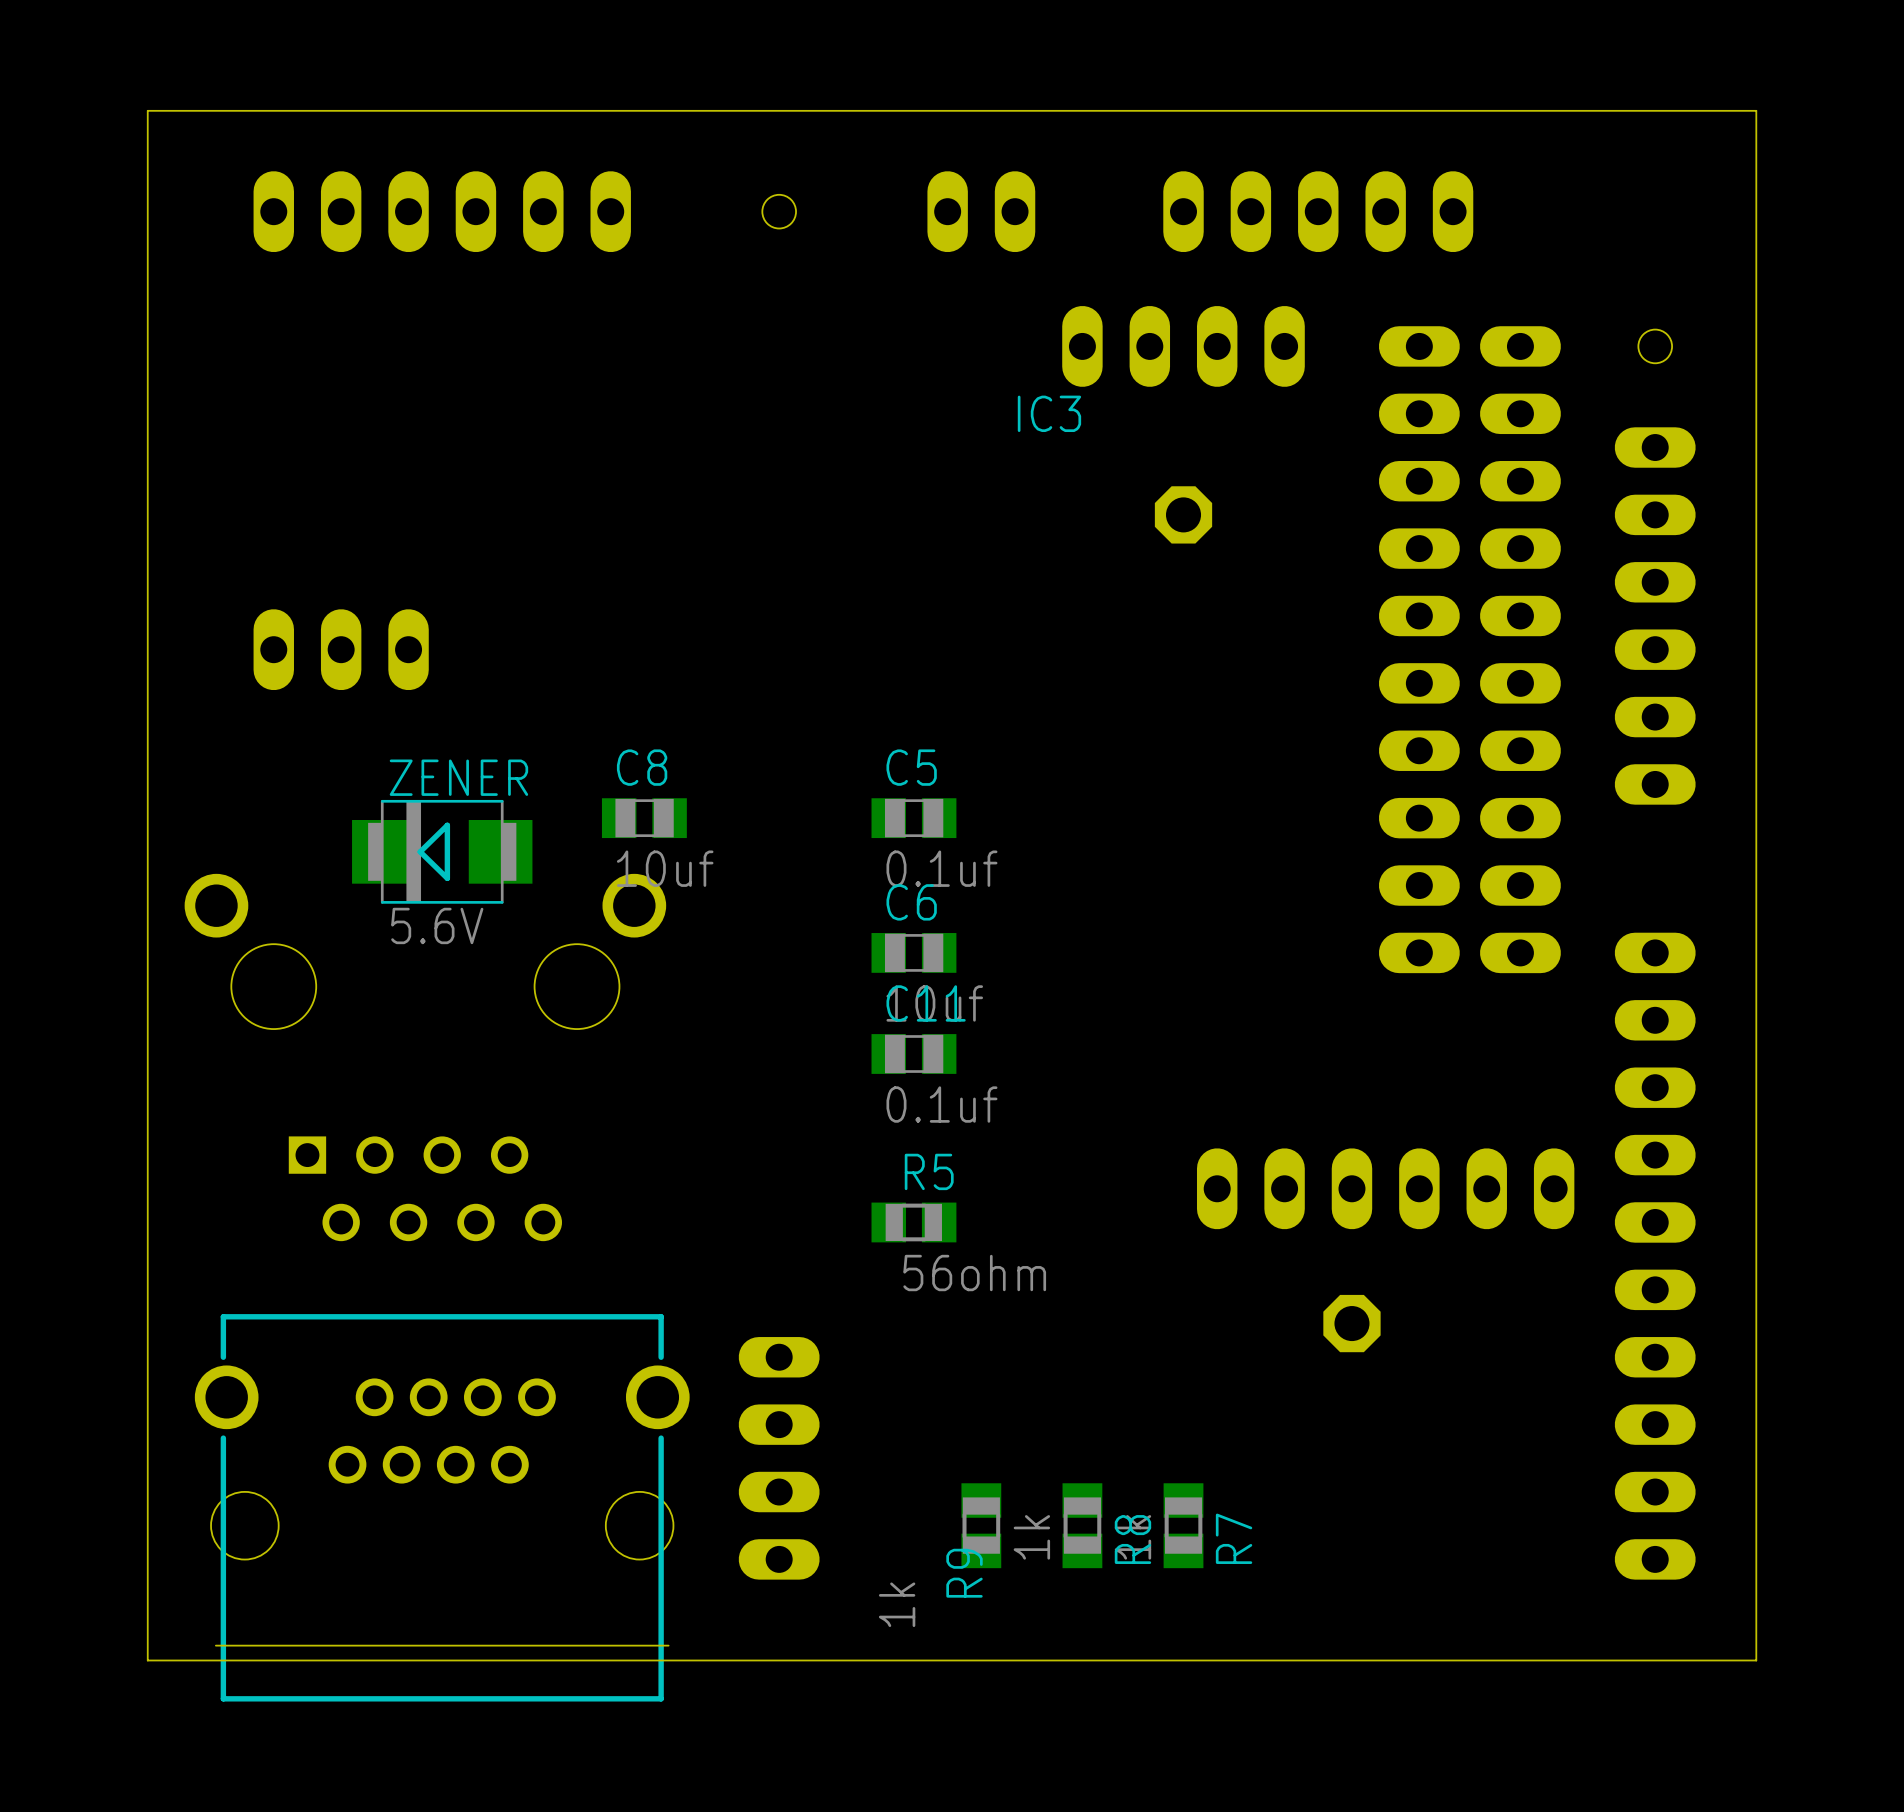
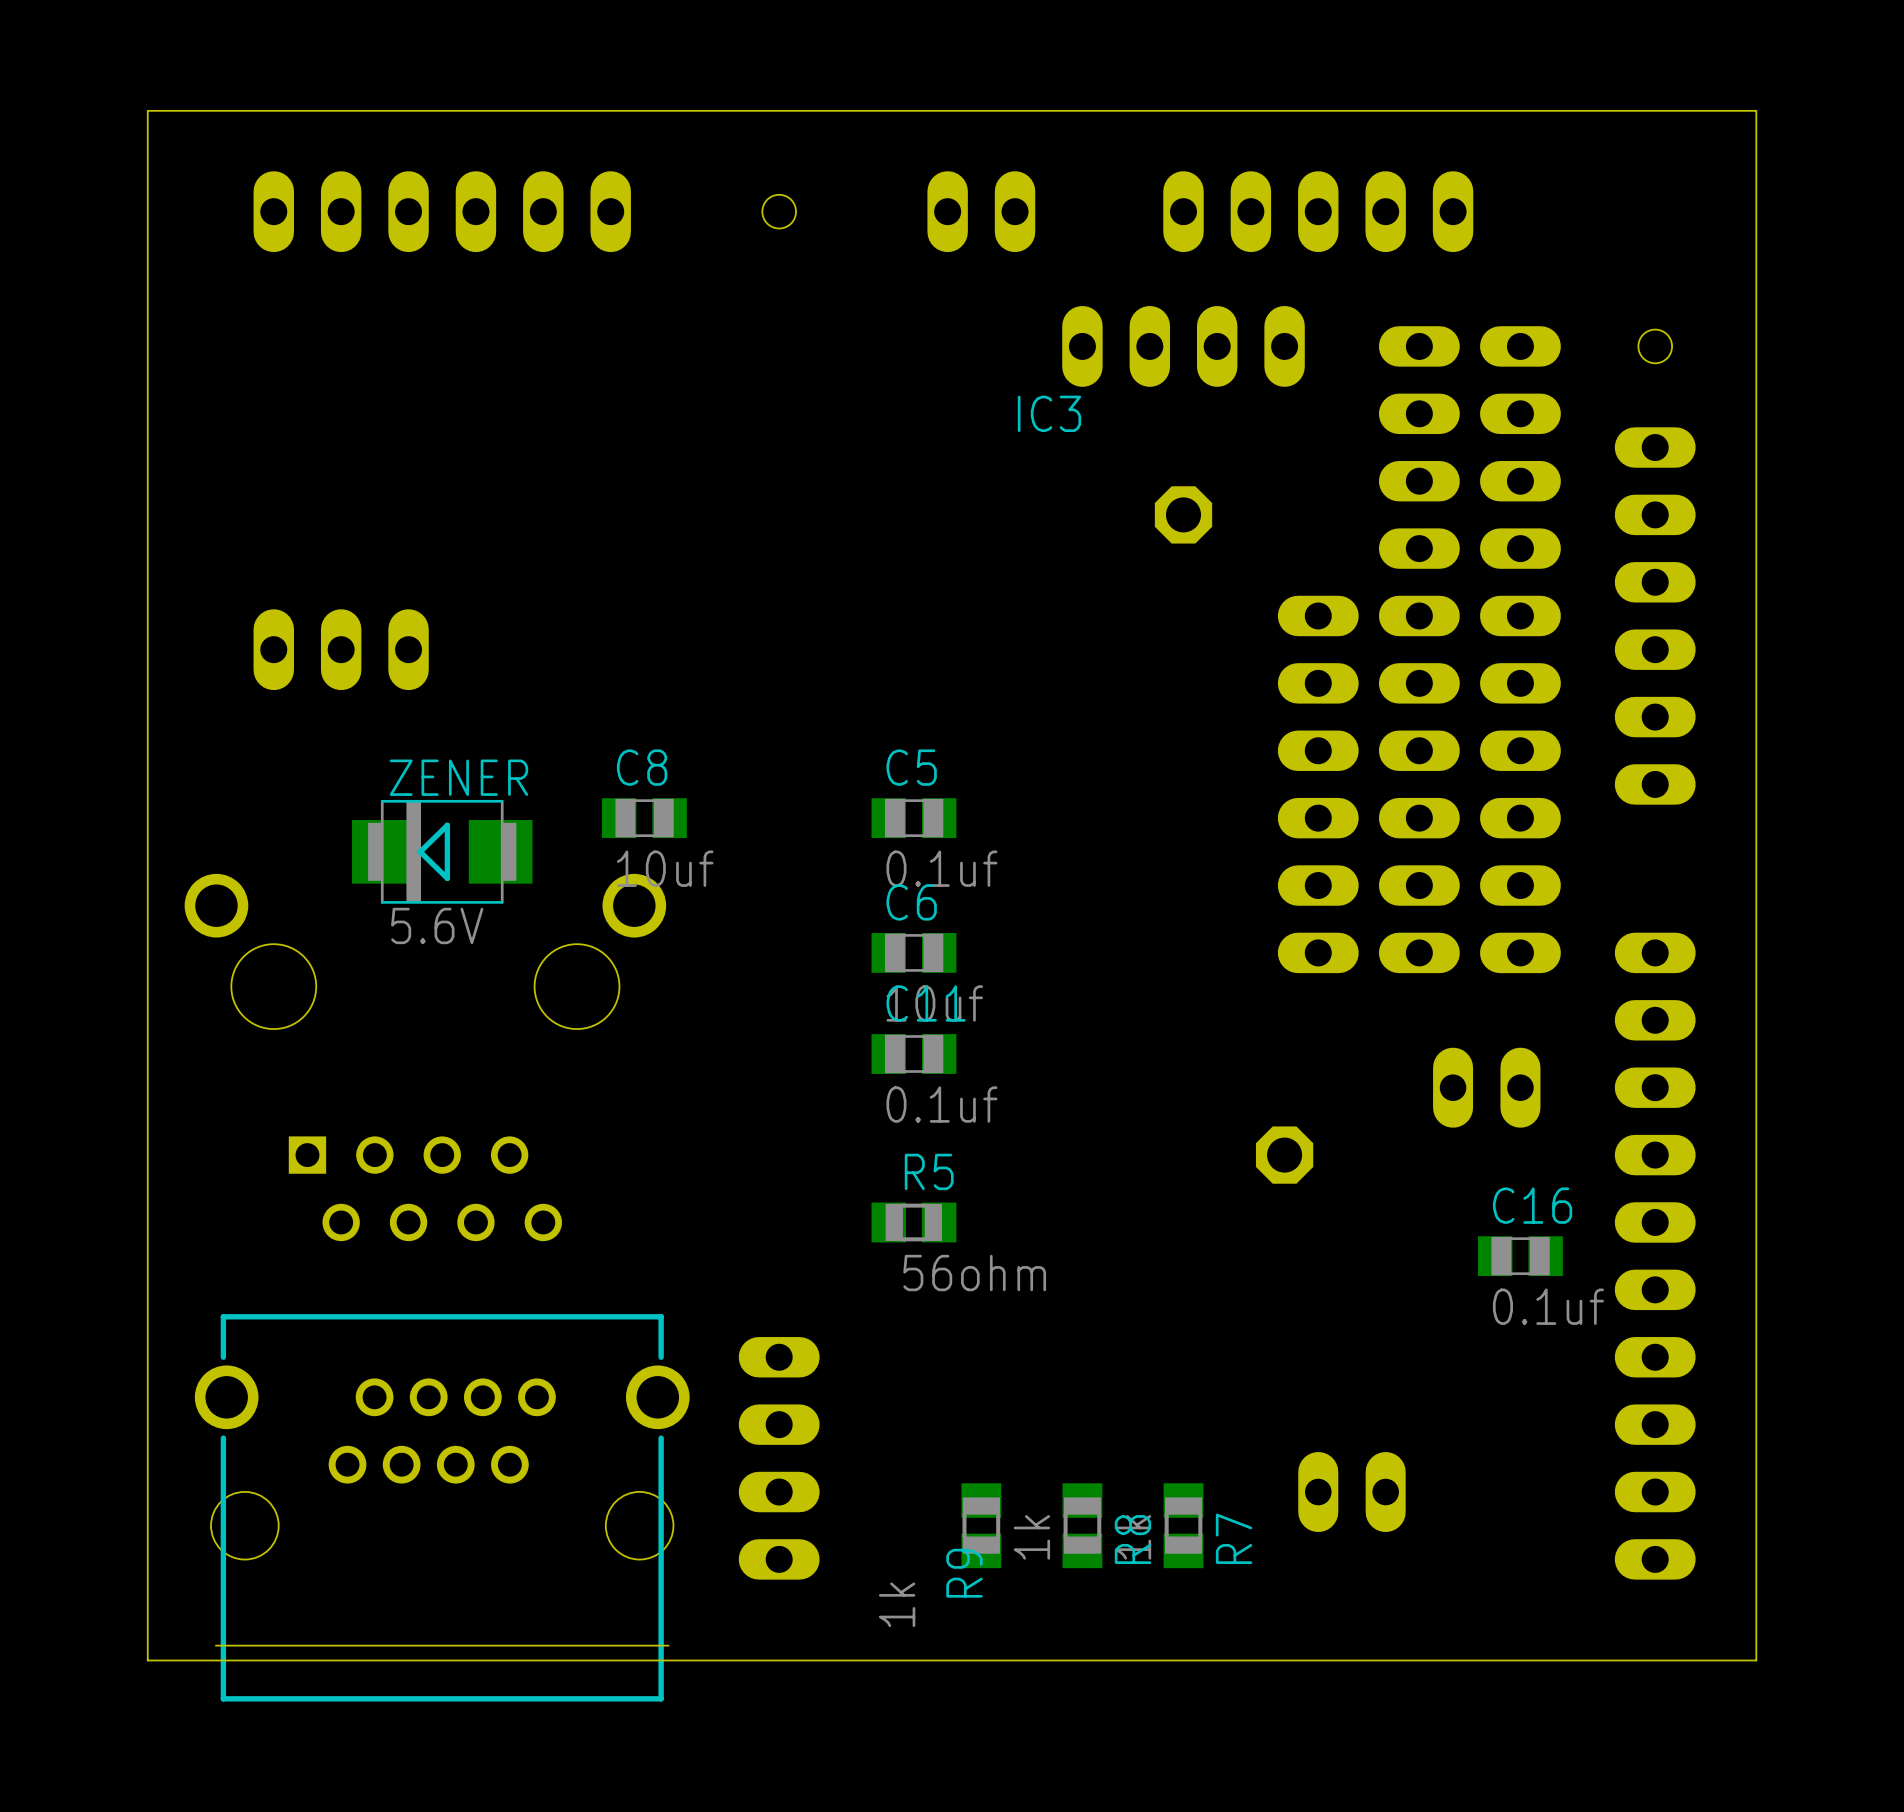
part: none -> (1486, 1087)
part rotation: 0° (1385, 1188) -> 90° clockwise (1318, 784)
part position: (1385, 1188) -> (1318, 784)
C16: none -> 0.1uf (1520, 1256)
part position: (1351, 1323) -> (1284, 1155)
part: none -> (1351, 1492)

